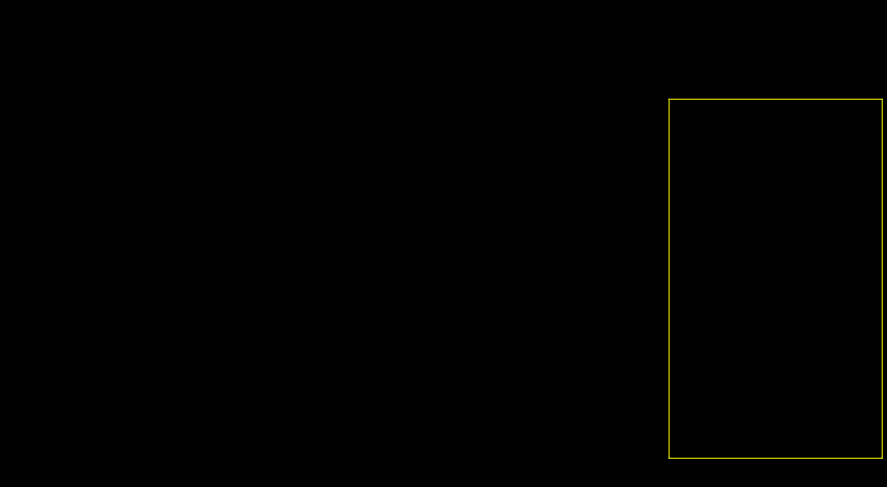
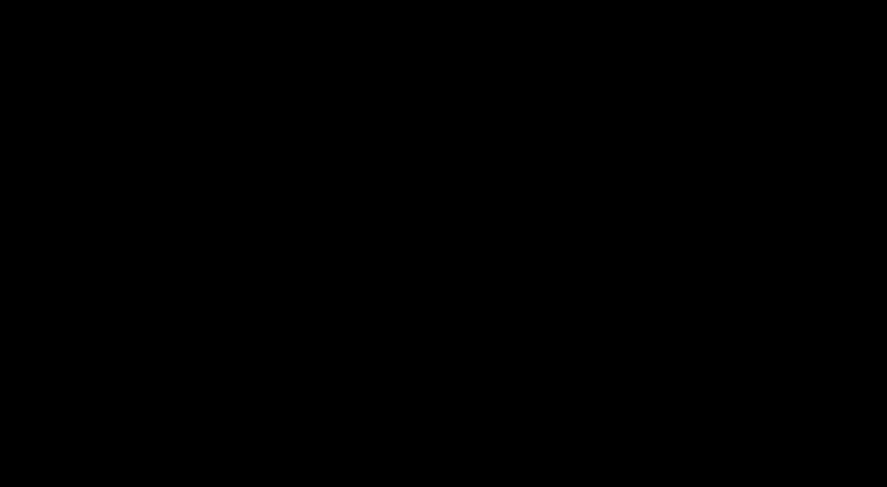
board edge: (882, 99) (669, 99) (669, 458) (882, 458) (882, 99) -> none

